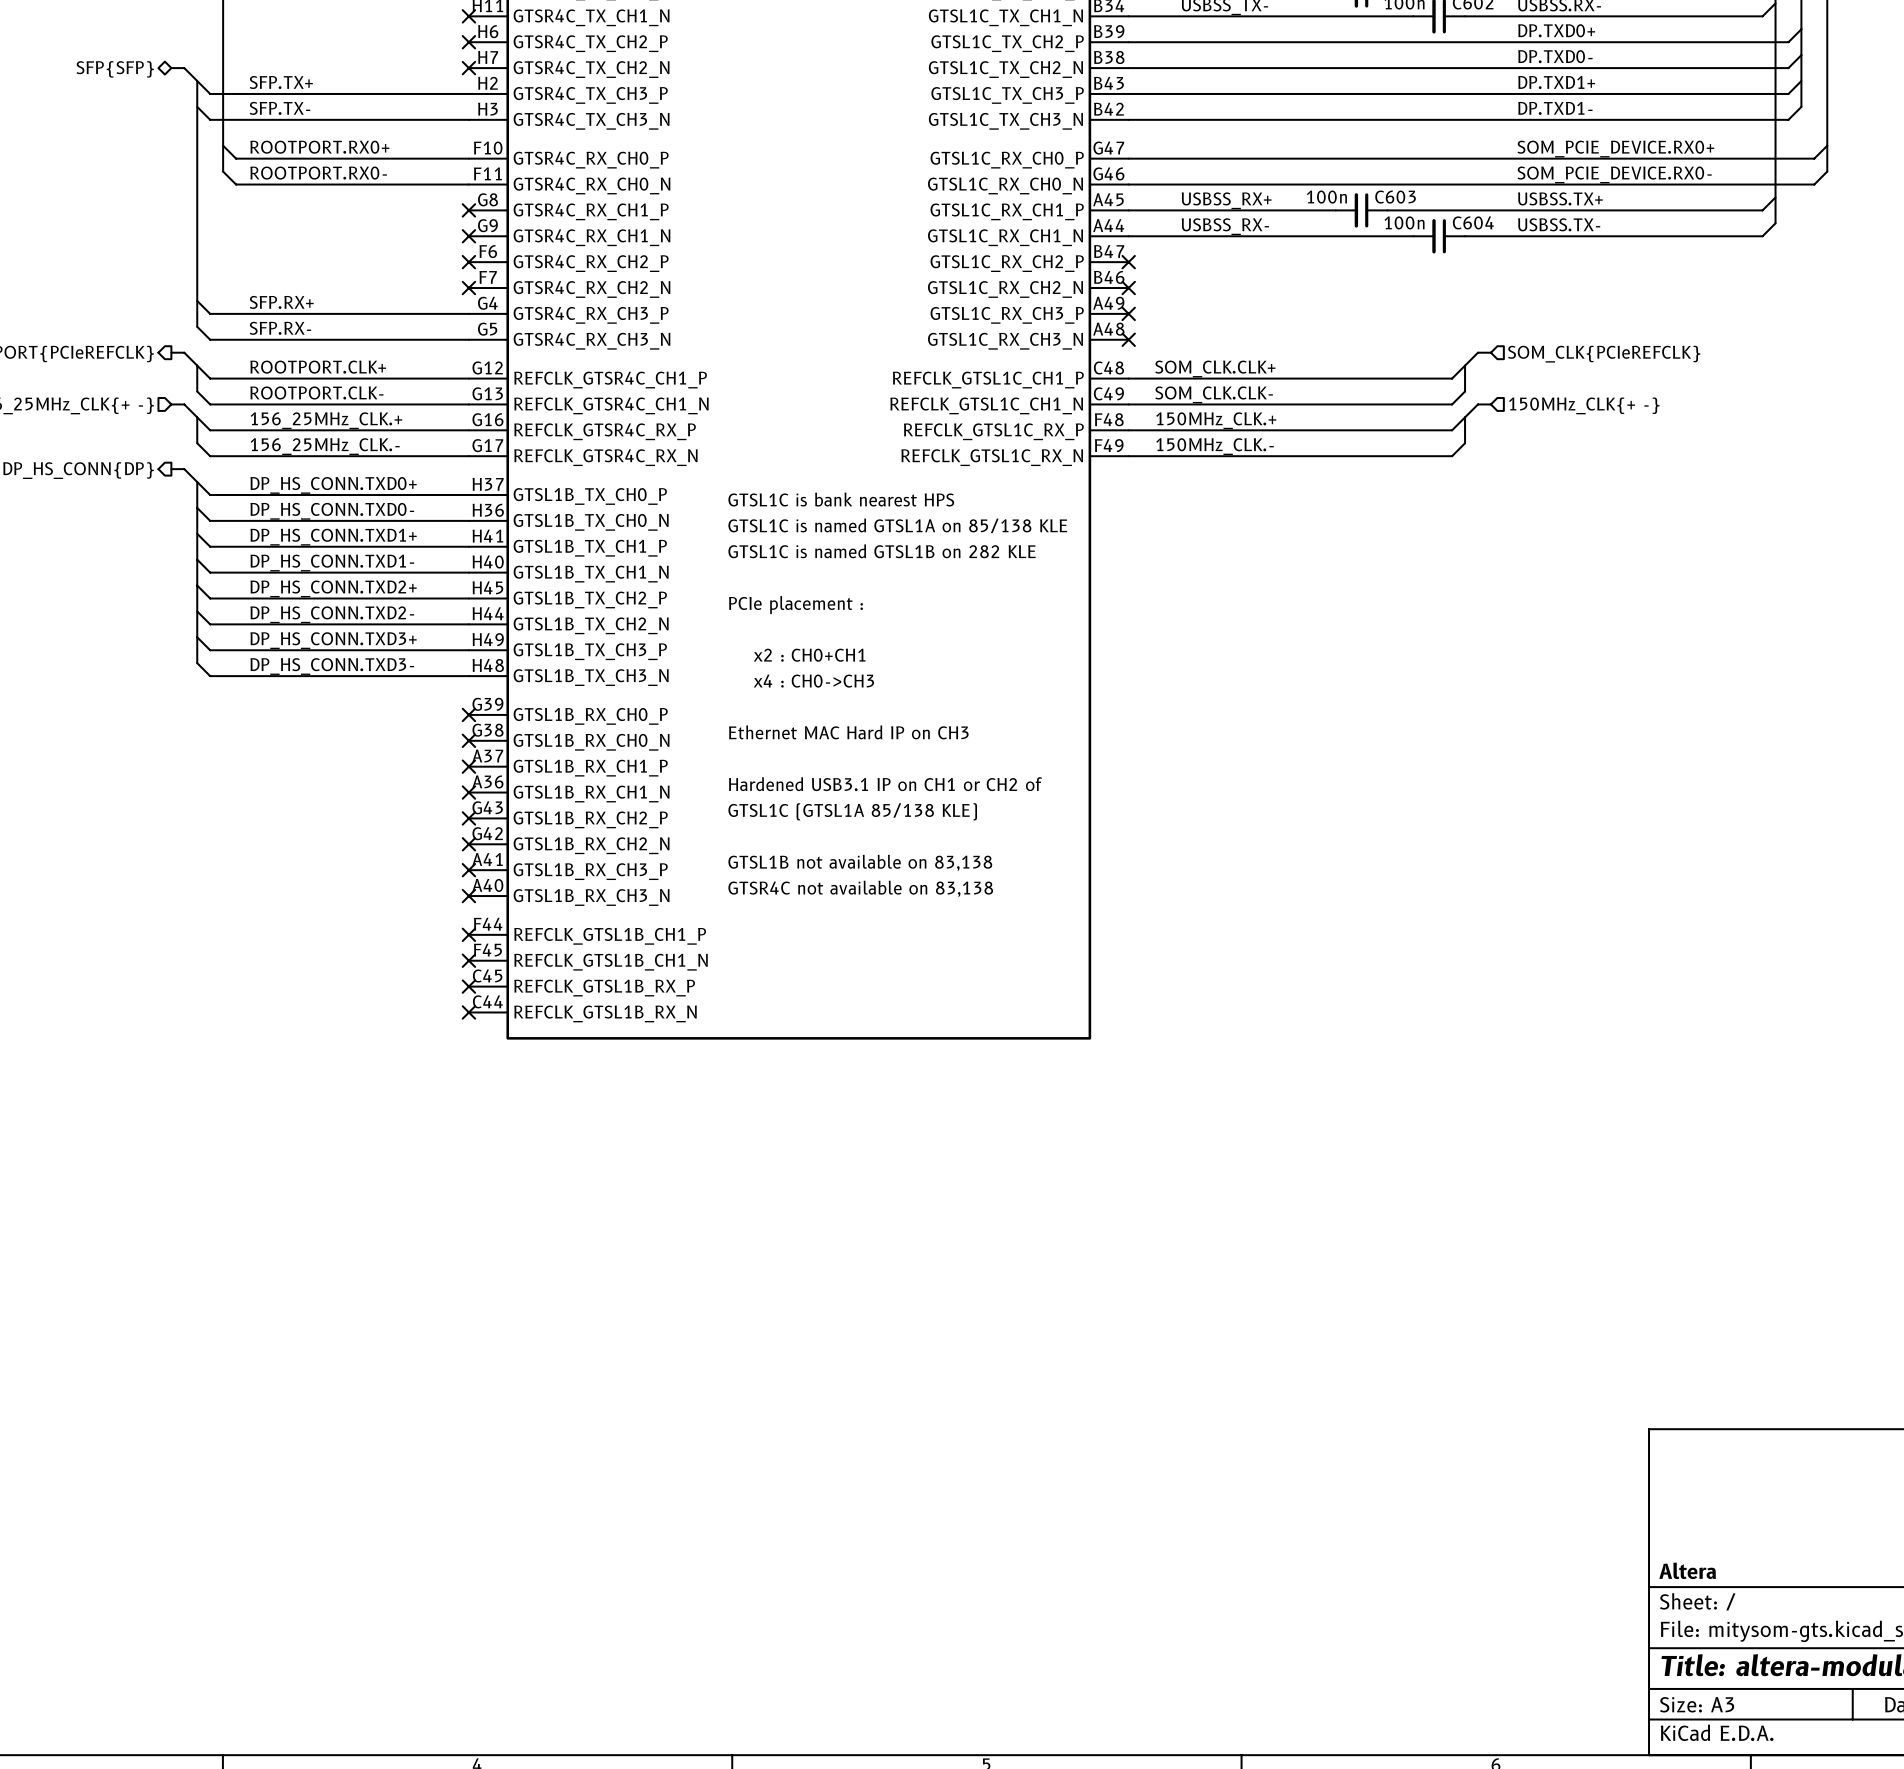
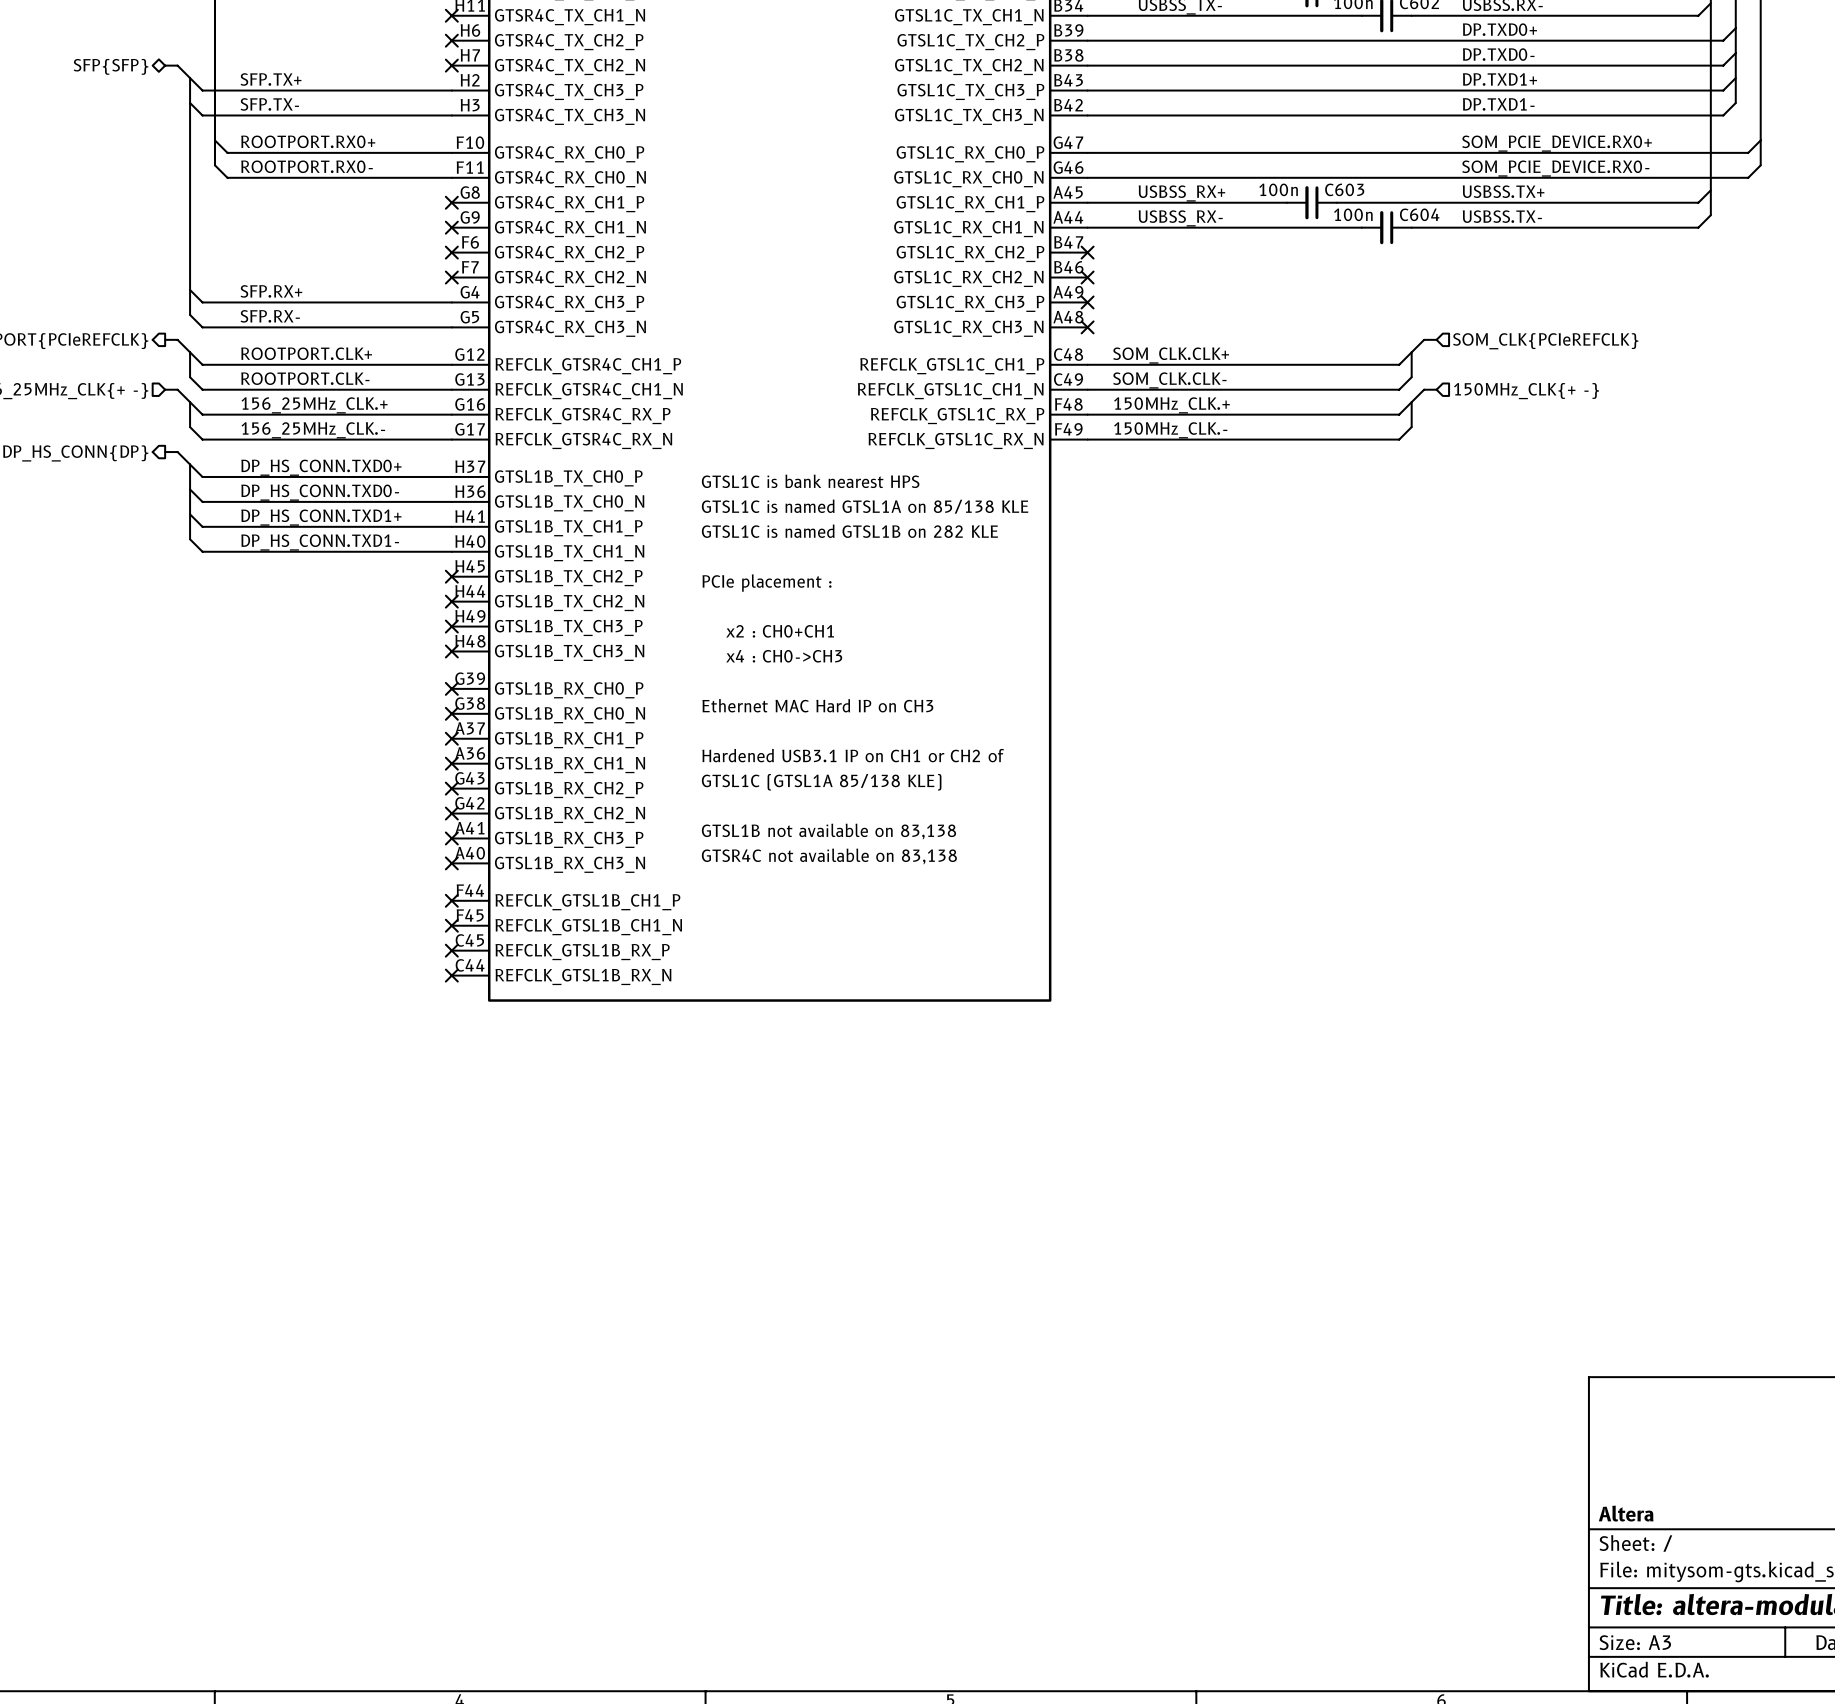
bus: (197, 559) (197, 663) -> none
wire: (197, 585) (210, 598) (468, 598) -> none
label: DP_HS_CONN.TXD2+ (333, 588) -> none
no-connect mark: none -> (451, 576)
wire: (197, 611) (210, 624) (468, 624) -> none
label: DP_HS_CONN.TXD2- (332, 614) -> none
no-connect mark: none -> (451, 601)
wire: (197, 637) (210, 650) (468, 650) -> none
label: DP_HS_CONN.TXD3+ (333, 640) -> none
no-connect mark: none -> (451, 626)
wire: (197, 663) (210, 676) (468, 676) -> none
label: DP_HS_CONN.TXD3- (332, 666) -> none
no-connect mark: none -> (451, 651)

